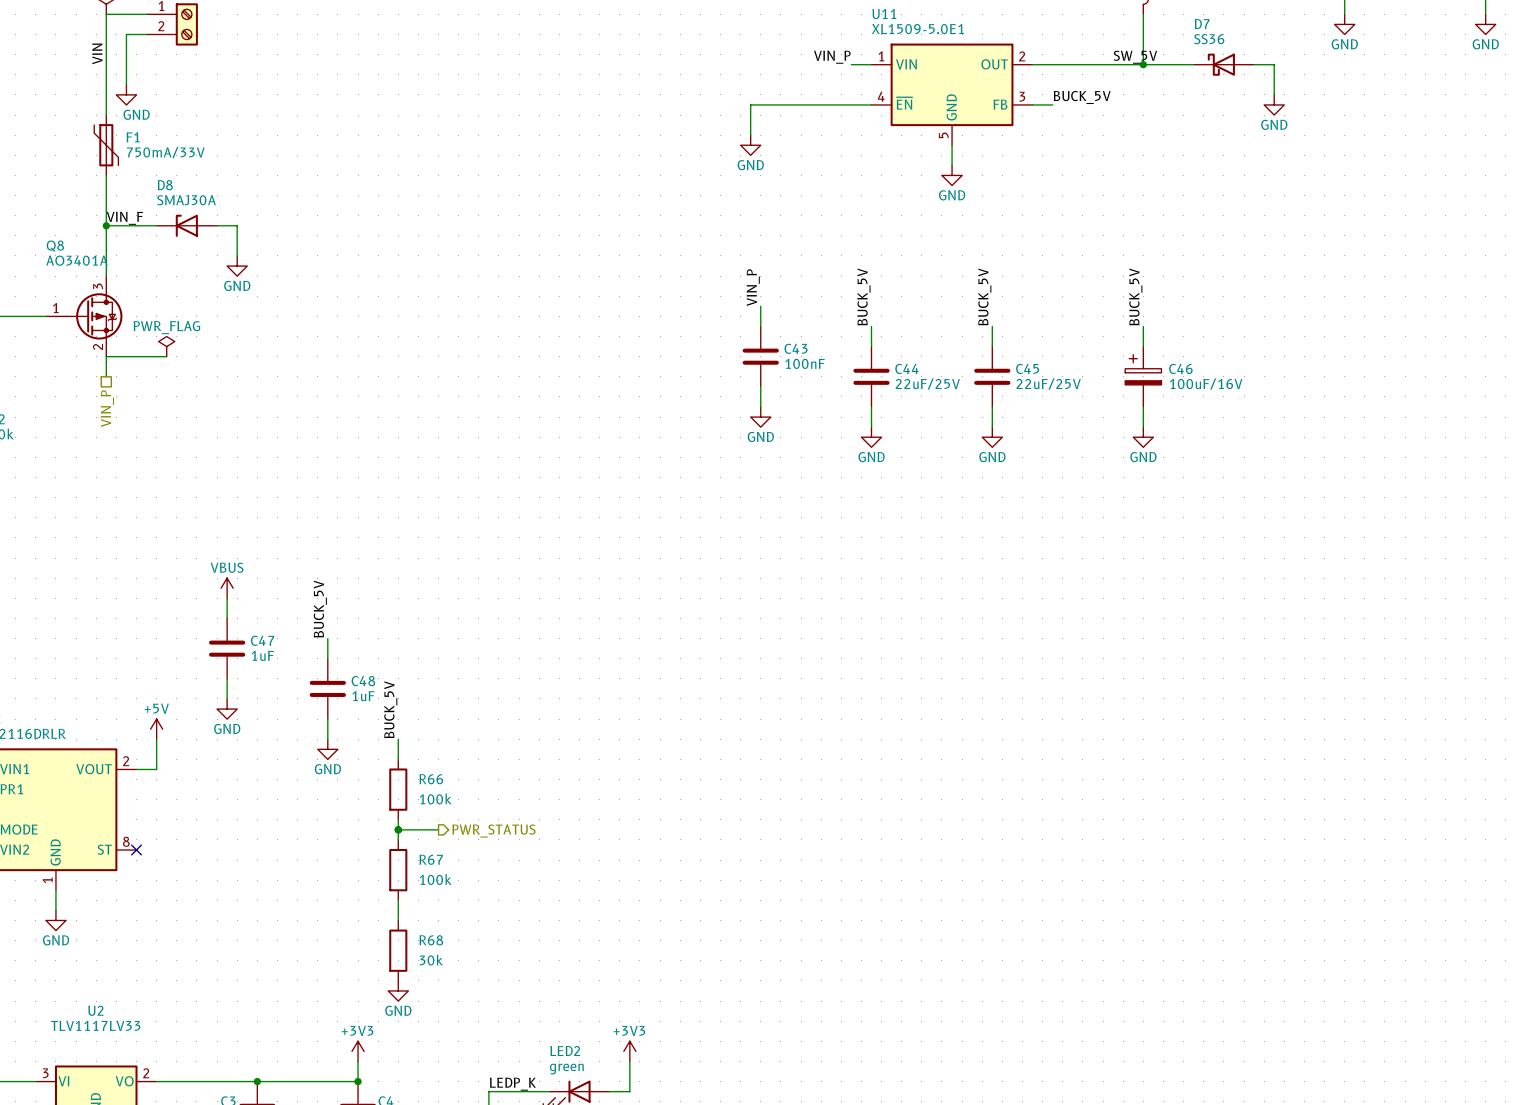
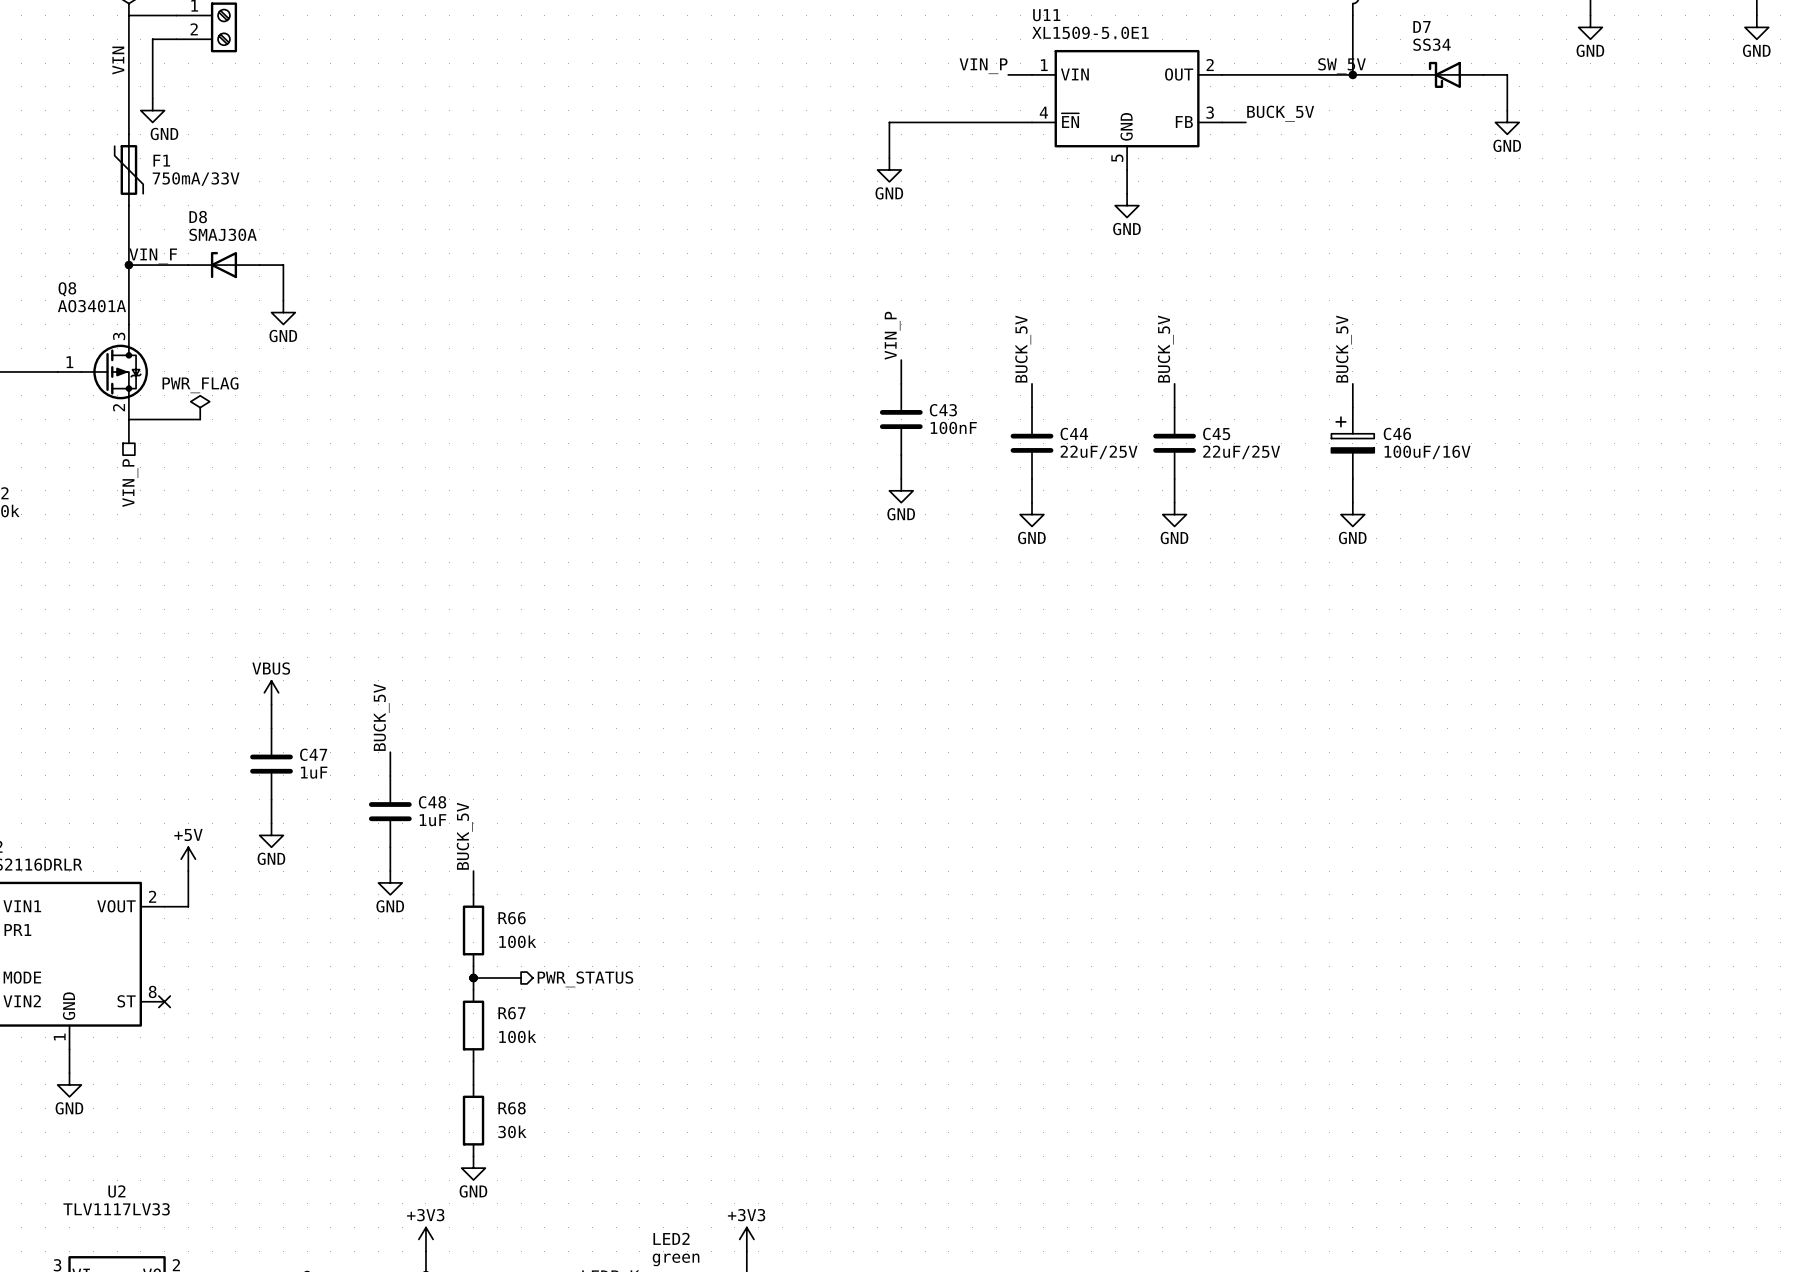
D7 value: SS36 (1209, 39) -> SS34 (1432, 44)

